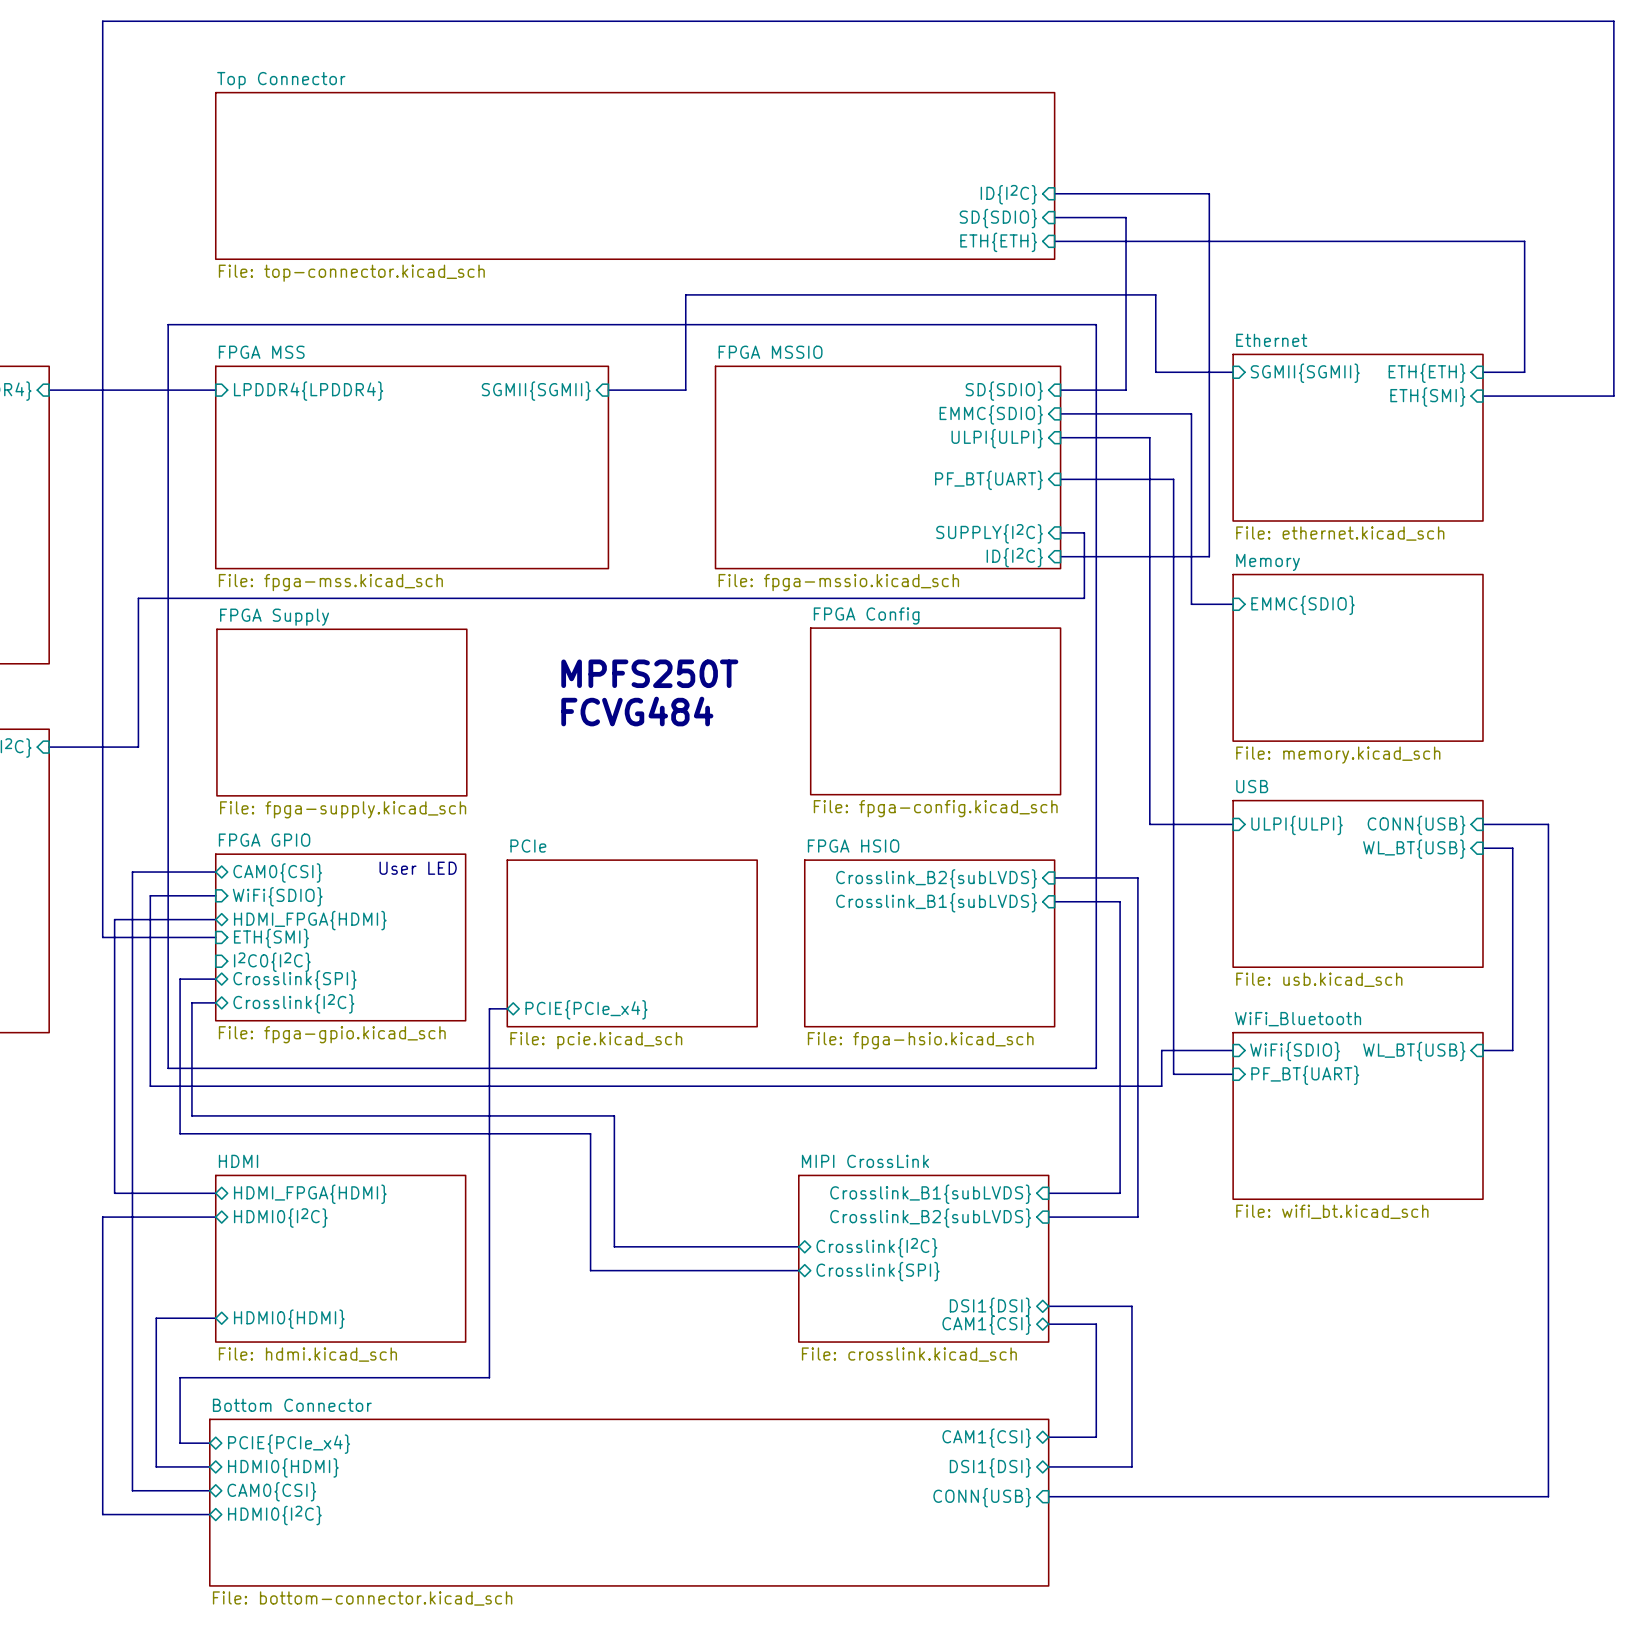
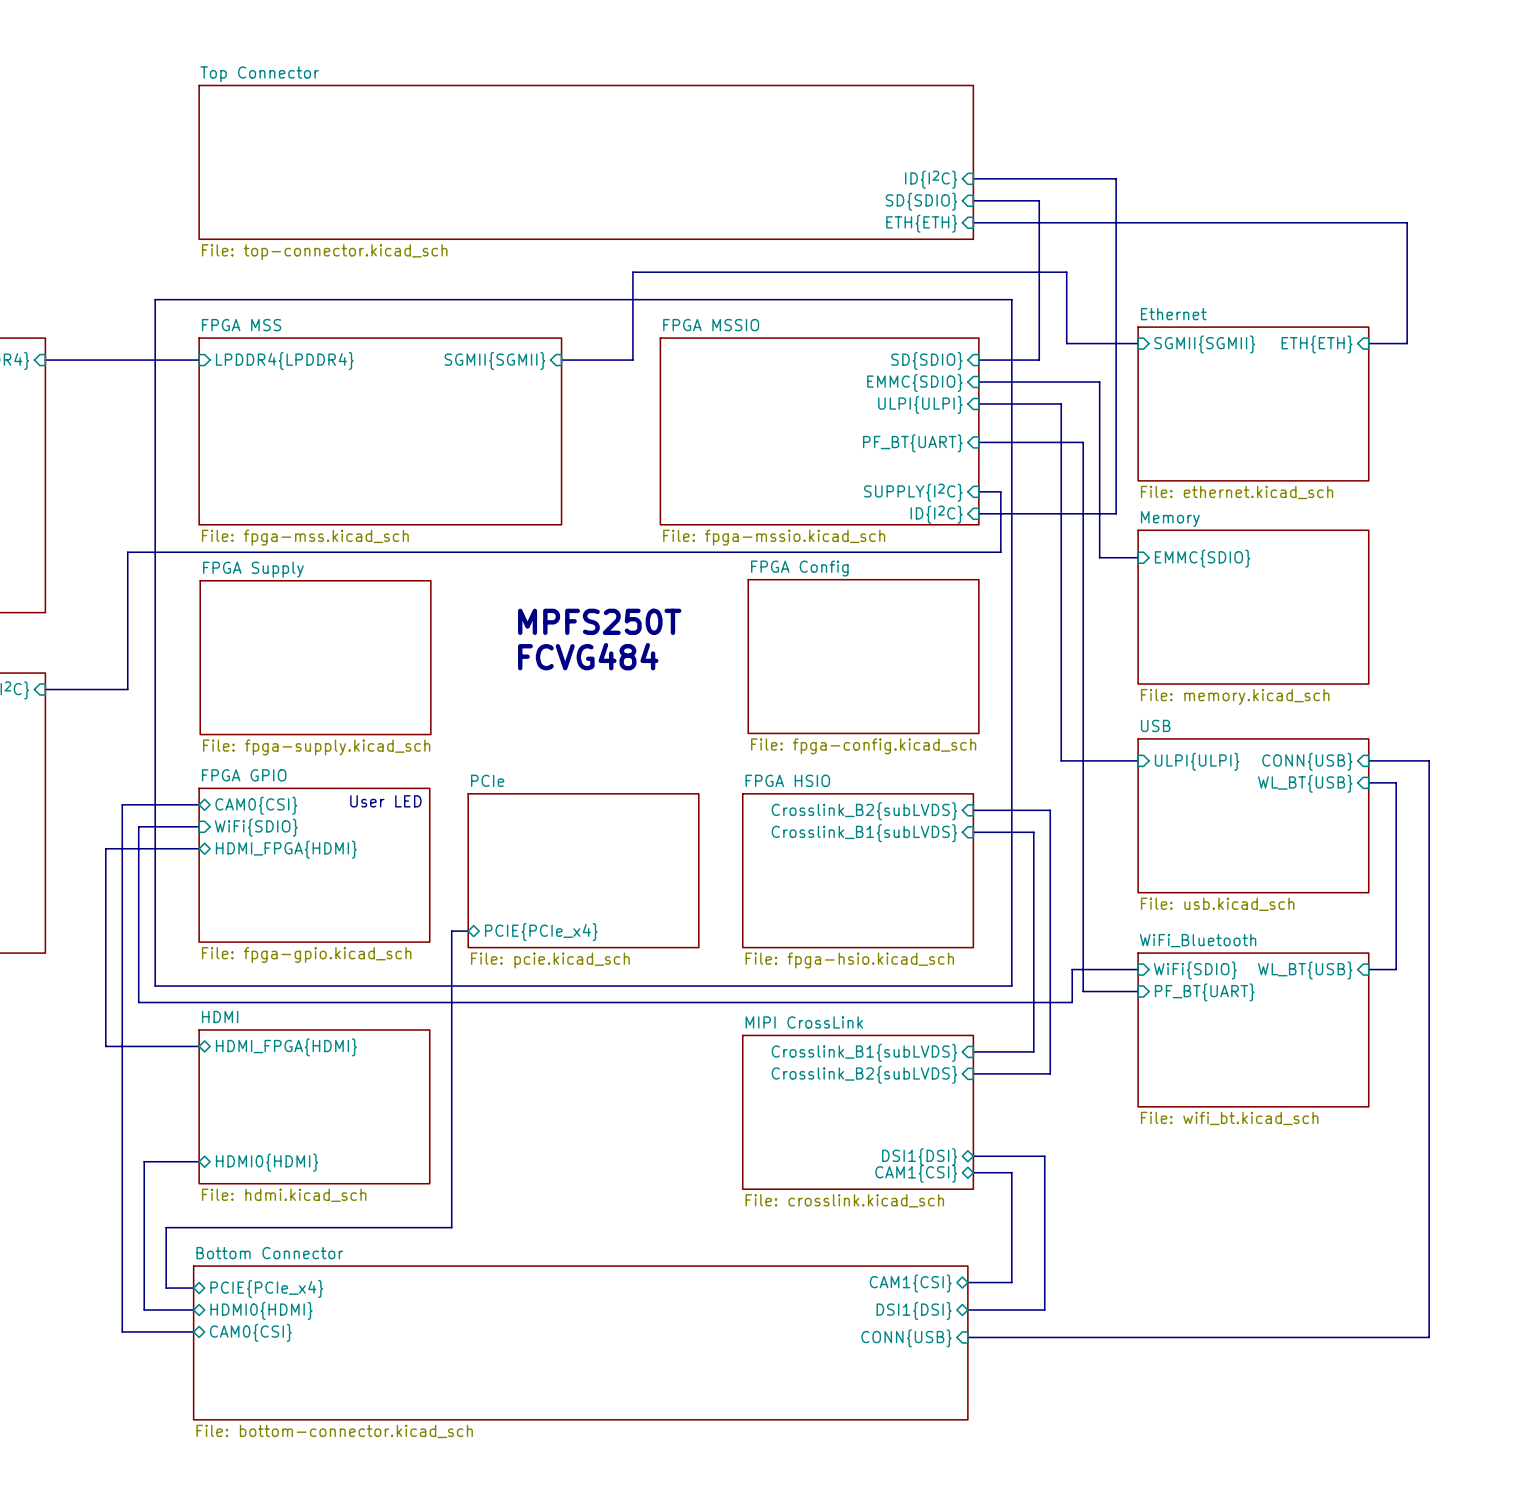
bus: (1482, 396) (1613, 396) (1613, 21) (102, 21) (102, 937) (215, 937) -> none
sheet pin: ETH{SMI} (1427, 397) -> none
sheet pin: ETH{SMI} (271, 938) -> none
sheet pin: I2C0{I2C} (272, 962) -> none
bus: (215, 979) (180, 979) (180, 1133) -> none
sheet pin: Crosslink{SPI} (294, 980) -> none
bus: (215, 1002) (191, 1002) (191, 1115) (614, 1115) (614, 1246) (798, 1246) -> none
sheet pin: Crosslink{I2C} (293, 1003) -> none
bus: (114, 1133) (114, 1193) (215, 1193) -> (105, 1046) (166, 1046)
bus: (215, 1133) (590, 1133) (590, 1270) (798, 1270) -> none
bus: (1120, 1139) (1120, 1193) (1048, 1193) -> (1033, 1051) (973, 1051)
bus: (1137, 1163) (1137, 1217) (1048, 1217) -> (1050, 1073) (973, 1073)
sheet pin position: HDMI_FPGA{HDMI} (310, 1194) -> HDMI_FPGA{HDMI} (286, 1047)
sheet pin position: Crosslink_B1{subLVDS} (930, 1194) -> Crosslink_B1{subLVDS} (864, 1052)
bus: (215, 1217) (102, 1217) (102, 1514) (209, 1514) -> none
sheet pin: HDMI0{I2C} (280, 1218) -> none
sheet pin position: Crosslink_B2{subLVDS} (930, 1218) -> Crosslink_B2{subLVDS} (864, 1074)
sheet pin: Crosslink{I2C} (876, 1247) -> none
sheet HDMI position: (340, 1258) -> (314, 1106)
sheet MIPI CrossLink position: (923, 1258) -> (858, 1112)
sheet pin: none -> HDMI0{HDMI} (267, 1162)
sheet pin: Crosslink{SPI} (878, 1271) -> none
sheet pin: none -> CAM1{CSI} (916, 1173)
bus: (1048, 1306) (1131, 1306) -> (973, 1156) (1044, 1156) (1044, 1205)
sheet pin position: DSI1{DSI} (990, 1307) -> DSI1{DSI} (919, 1157)
bus: (156, 1318) (215, 1318) -> (144, 1216) (144, 1161) (199, 1161)
sheet pin: HDMI0{HDMI} (289, 1319) -> none
bus: (1048, 1324) (1096, 1324) -> (973, 1172) (1011, 1172) (1011, 1222)
sheet pin: CAM1{CSI} (986, 1325) -> none
bus: (489, 1330) (489, 1377) (180, 1377) -> (451, 1227) (166, 1227) (166, 1271)
bus: (1096, 1389) (1096, 1437) (1048, 1437) -> (1011, 1282) (967, 1282)
sheet pin: none -> CAM1{CSI} (910, 1283)
bus: (180, 1395) (180, 1443) -> (166, 1288) (193, 1288)
sheet pin: none -> PCIE{PCIe_x4} (266, 1288)
bus: (156, 1419) (156, 1466) (209, 1466) -> (144, 1310) (193, 1310)
bus: (1131, 1419) (1131, 1466) (1048, 1466) -> (1044, 1310) (967, 1310)
sheet pin: CAM1{CSI} (986, 1438) -> none
bus: (132, 1443) (132, 1490) (209, 1490) -> (122, 1331) (166, 1331)
sheet pin: PCIE{PCIe_x4} (289, 1444) -> CAM0{CSI} (250, 1332)
bus: (1548, 1449) (1548, 1496) (1048, 1496) -> (1429, 1337) (967, 1337)
sheet pin position: HDMI0{HDMI} (283, 1467) -> HDMI0{HDMI} (261, 1310)
sheet pin position: DSI1{DSI} (990, 1467) -> DSI1{DSI} (914, 1310)
sheet pin: CAM0{CSI} (271, 1491) -> none
sheet pin position: CONN{USB} (982, 1497) -> CONN{USB} (906, 1338)
sheet Bottom Connector position: (629, 1502) -> (580, 1342)
sheet pin: HDMI0{I2C} (274, 1515) -> none

